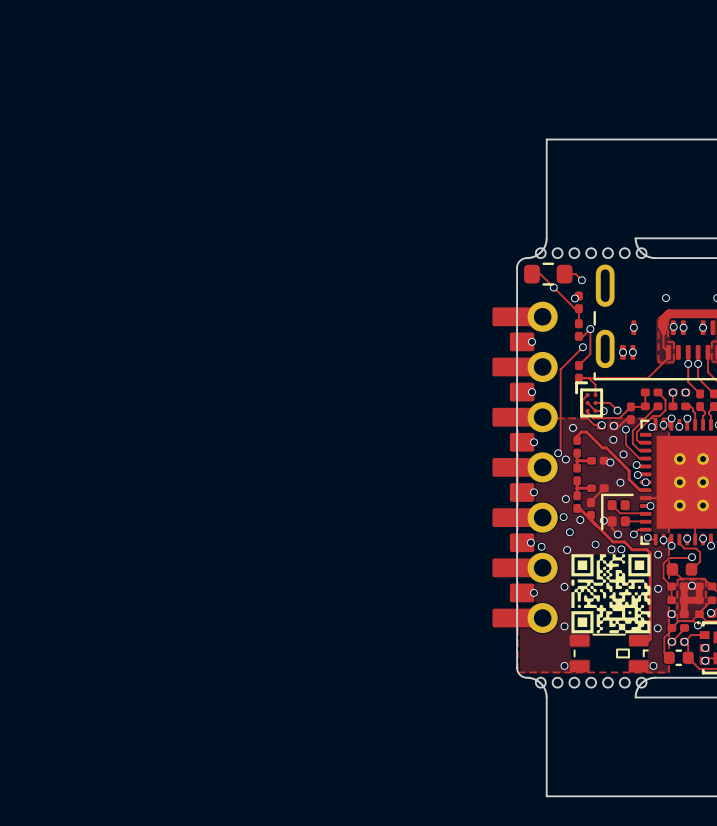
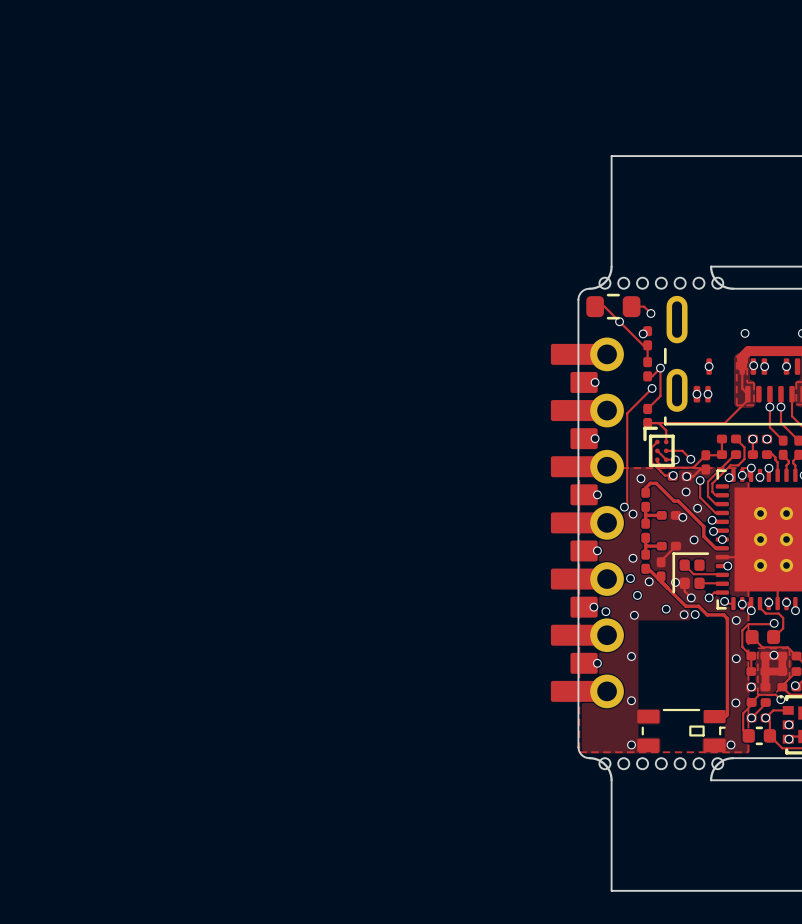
drawing: [571, 554, 651, 634] -> none

